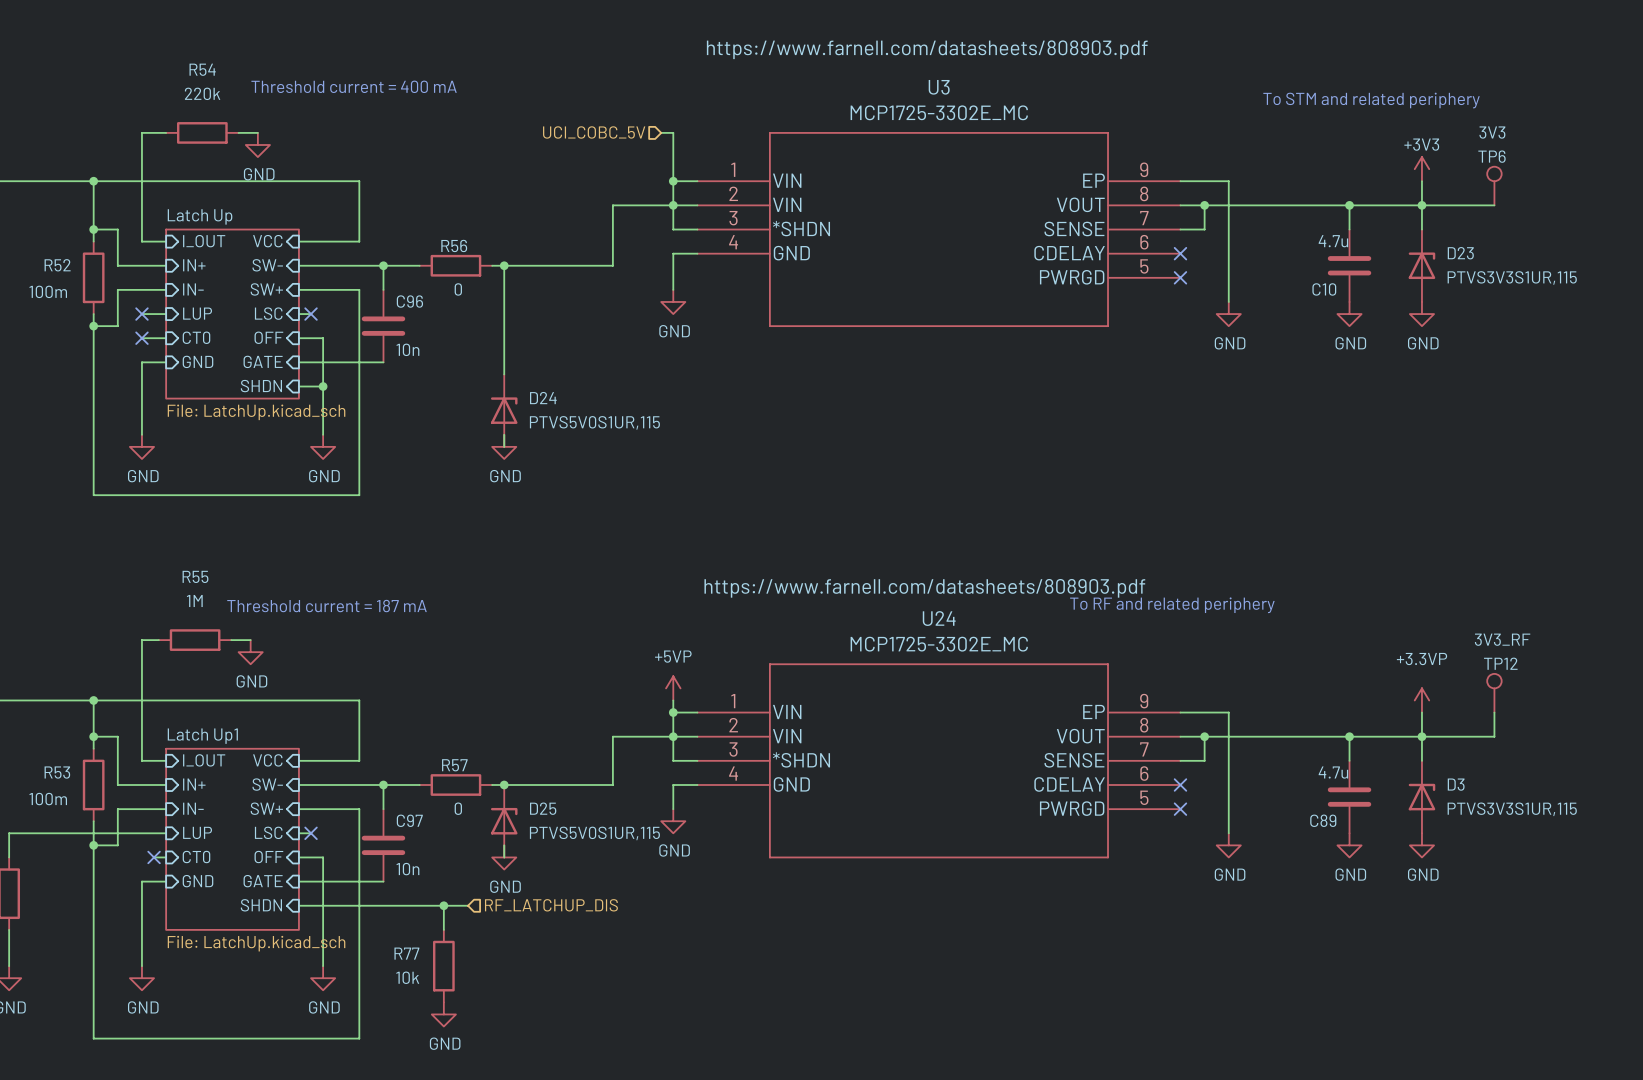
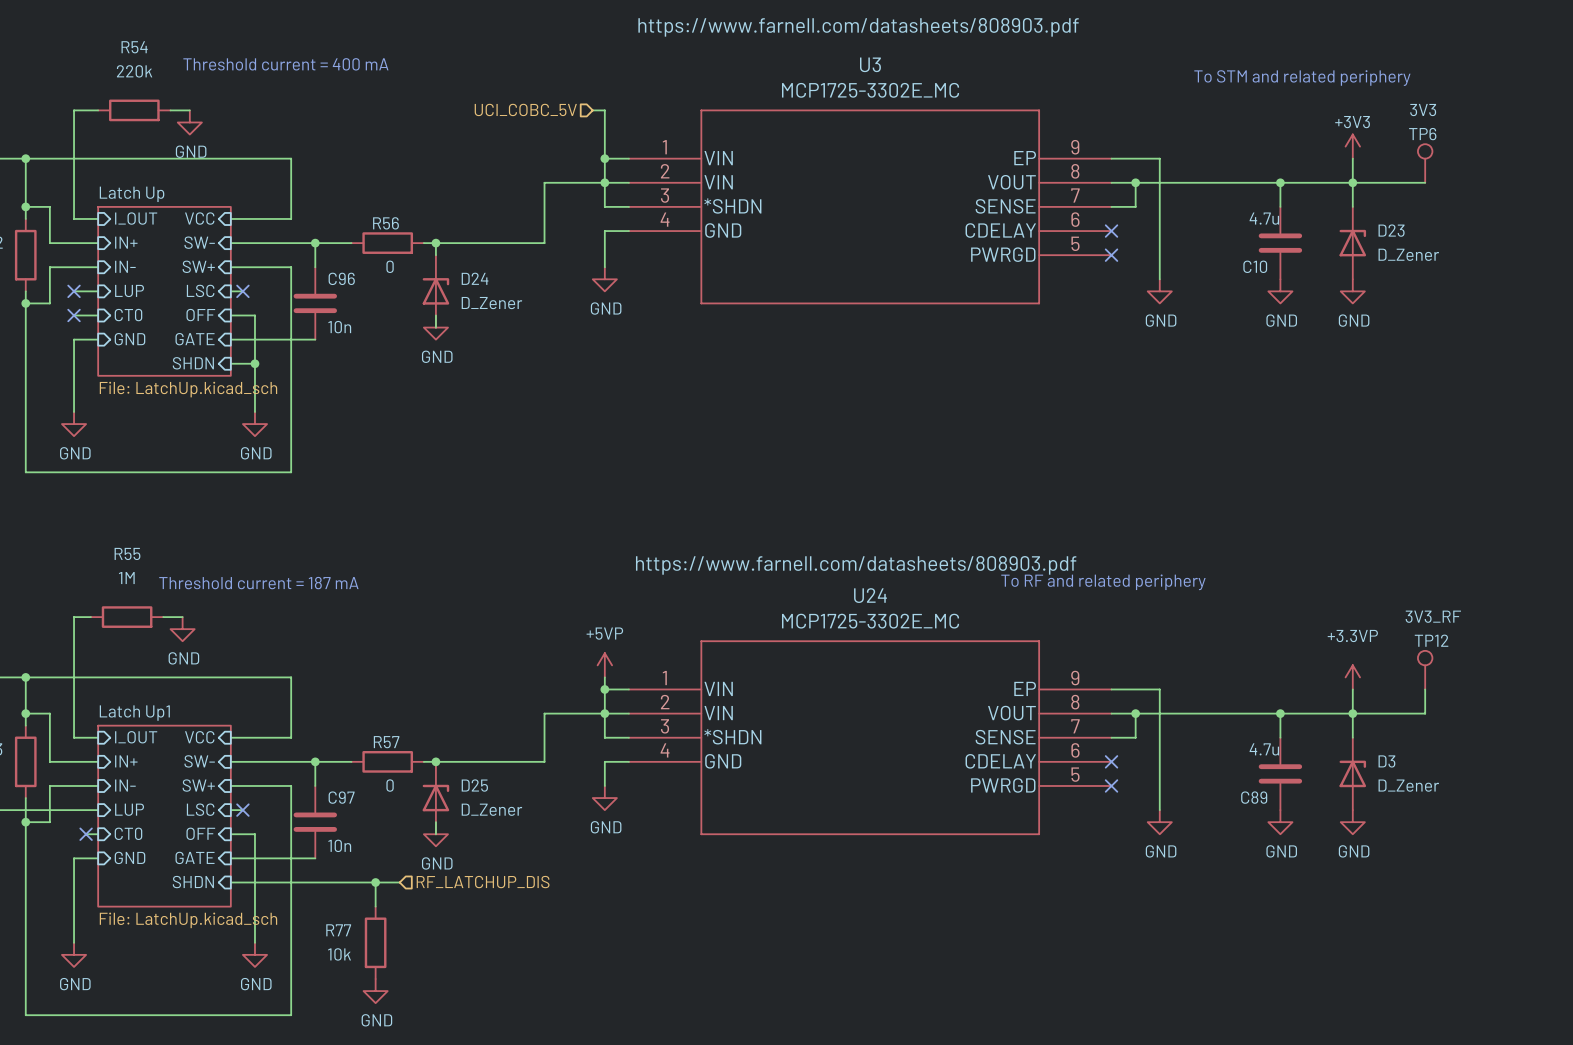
D23 value: PTVS3V3S1UR,115 (1512, 277) -> D_Zener (1408, 254)
wire: (504, 350) (504, 374) -> none
D24 position: (504, 410) -> (435, 291)
D24 value: PTVS5V0S1UR,115 (594, 422) -> D_Zener (491, 303)
wire: (504, 434) (504, 446) -> none
power symbol position: GND (504, 446) -> GND (435, 327)
D3 value: PTVS3V3S1UR,115 (1512, 809) -> D_Zener (1408, 785)
D25 value: PTVS5V0S1UR,115 (594, 833) -> D_Zener (491, 809)

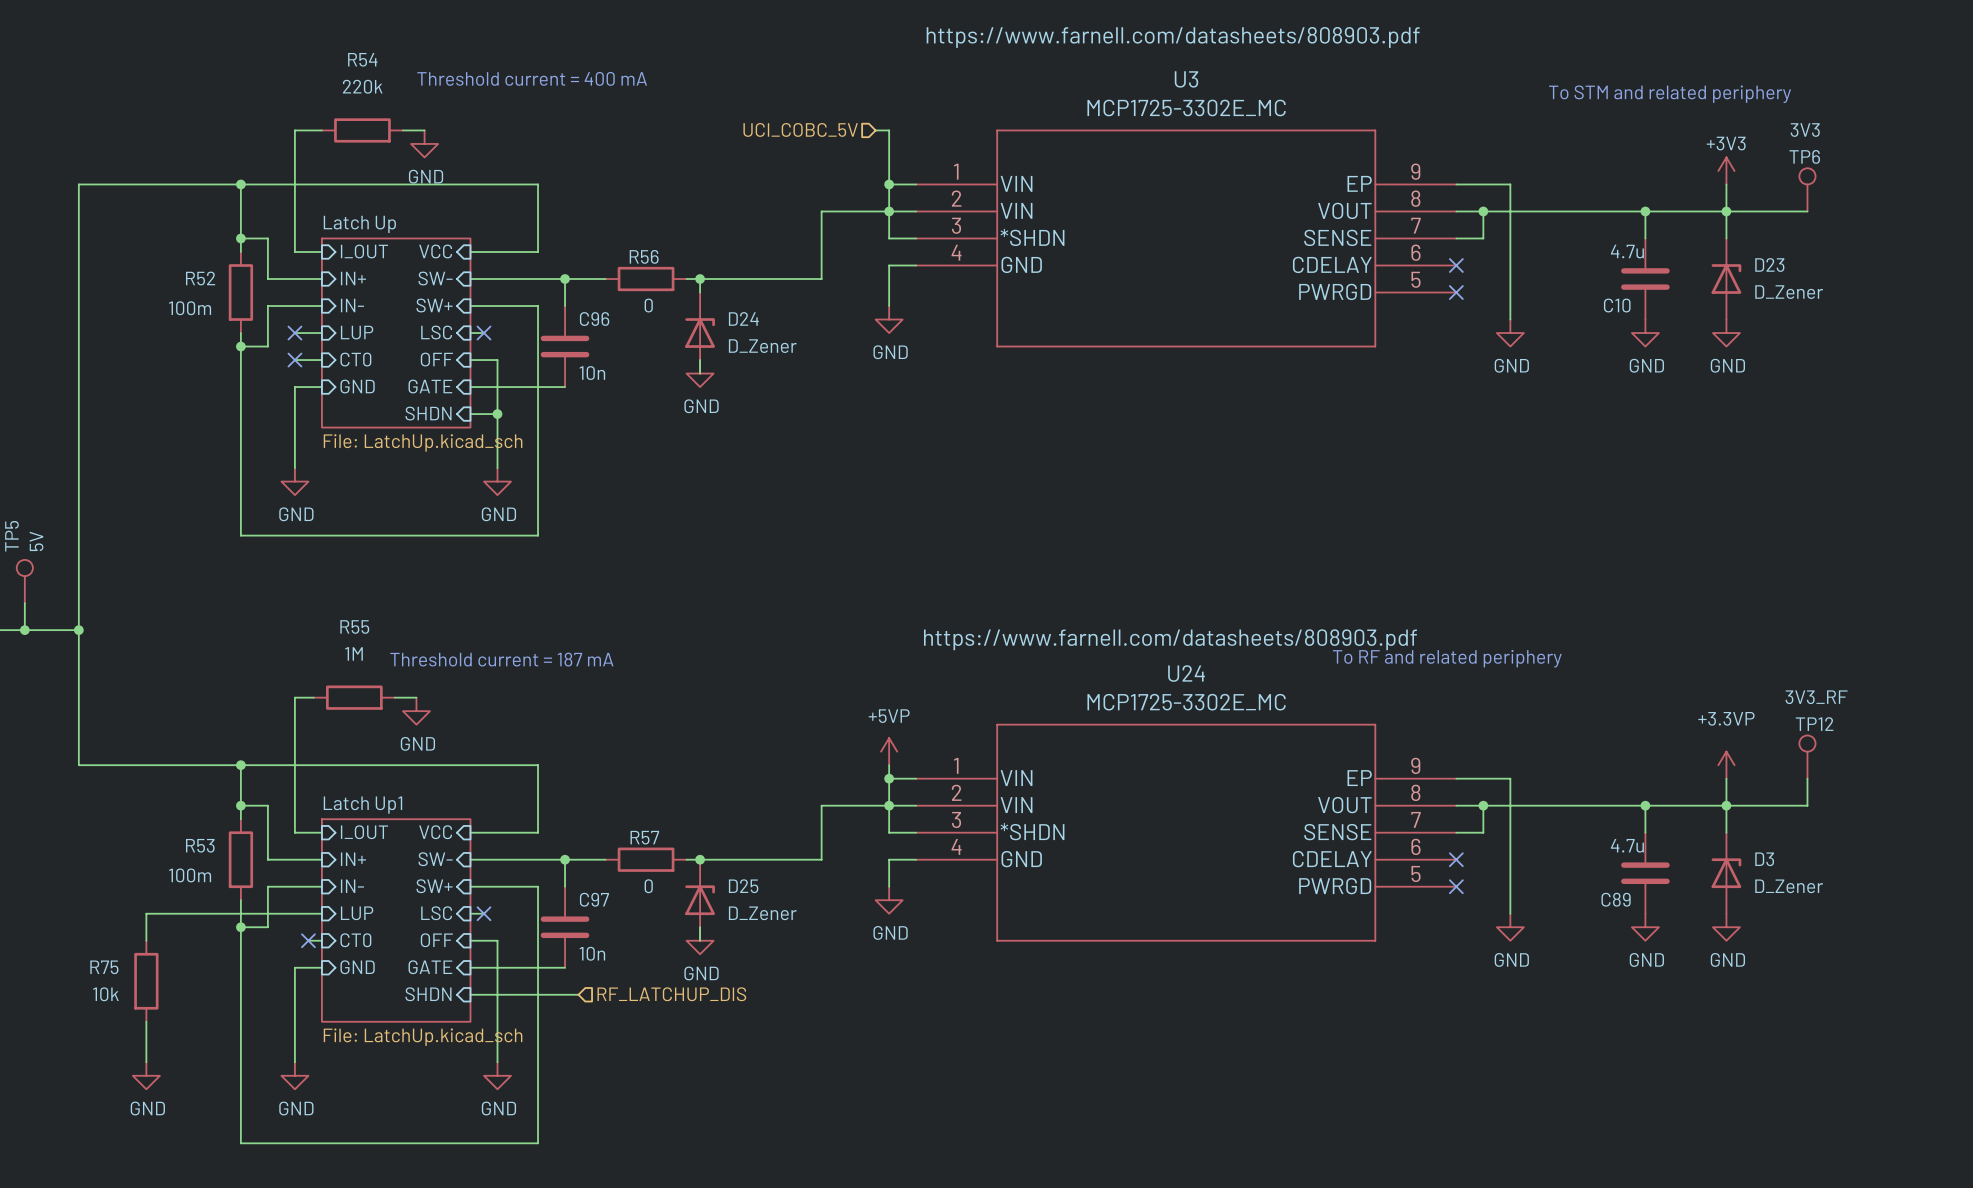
wire: (327, 882) (399, 882) -> none
wire: (375, 882) (375, 906) -> none
junction: (375, 882) -> none
hierarchical label position: RF_LATCHUP_DIS (483, 882) -> RF_LATCHUP_DIS (671, 994)
R77: 10k (375, 942) -> none
power symbol: GND (375, 991) -> none

